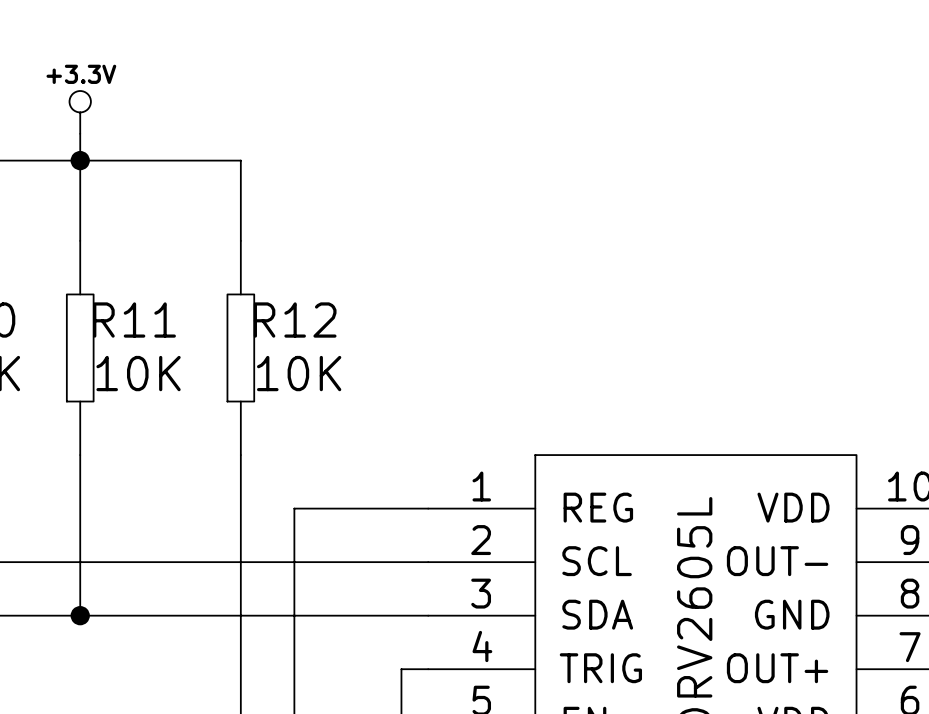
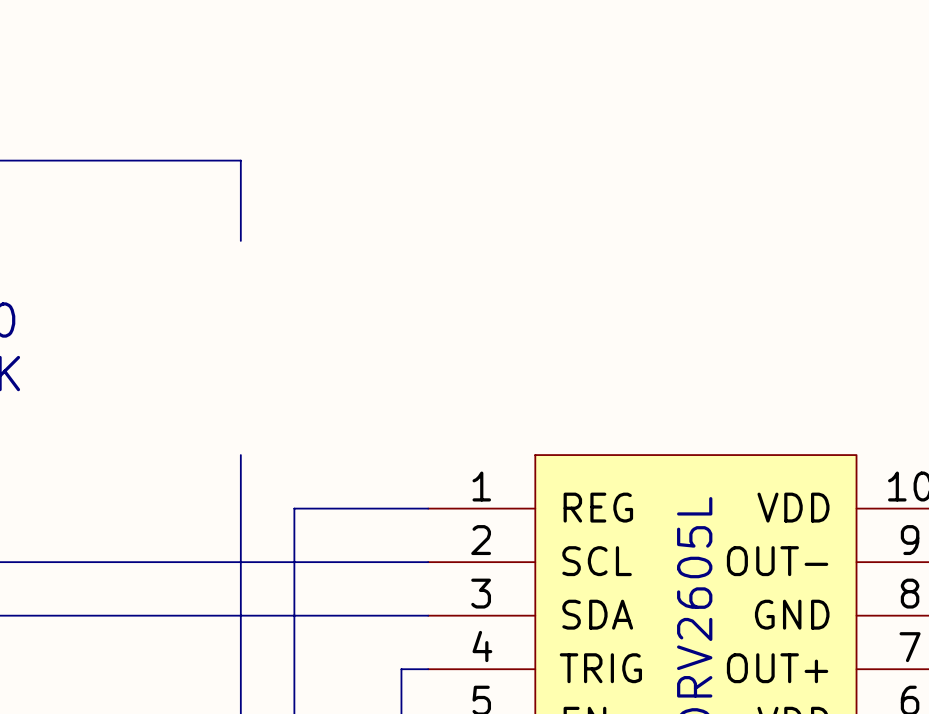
power symbol: +3.3V (80, 112) -> none
wire: (80, 133) (80, 240) -> none
junction: (80, 160) -> none
R11: (80, 347) -> none
R12: (240, 347) -> none
wire: (80, 455) (80, 615) -> none
junction: (80, 615) -> none

